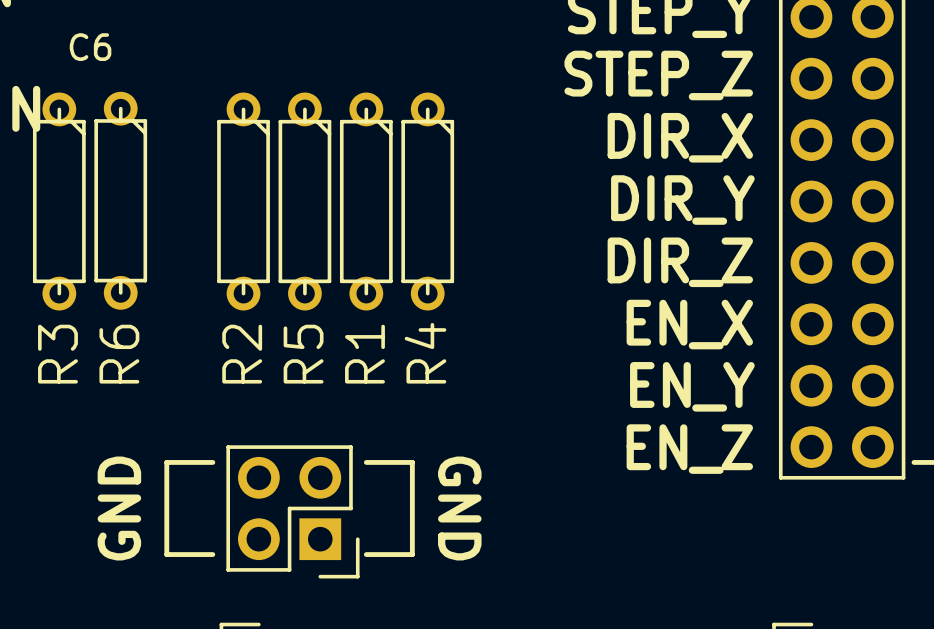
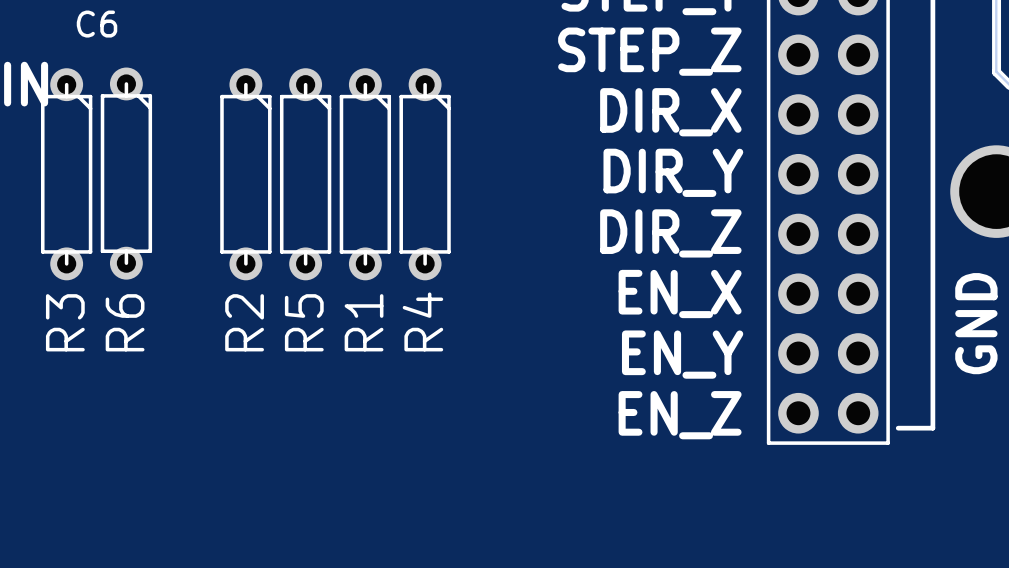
line: (212, 462) (166, 462) (166, 554) (212, 554) -> none
line: (366, 462) (412, 462) (412, 554) (366, 554) -> none
text: GND (119, 508) -> none
text: GND (459, 508) -> none
part: (292, 511) -> none

